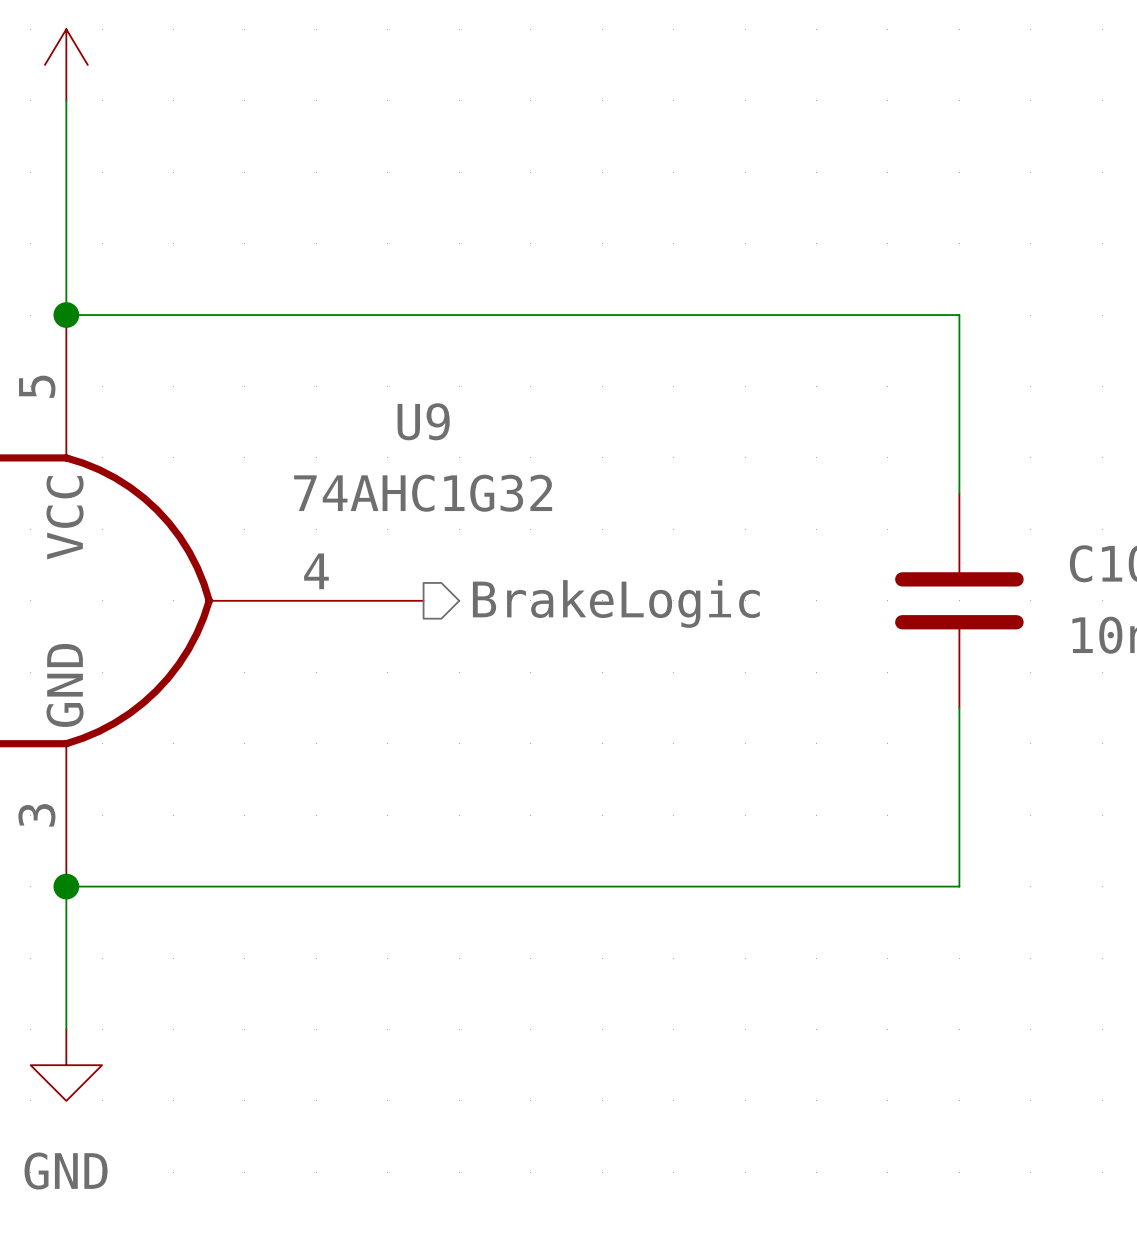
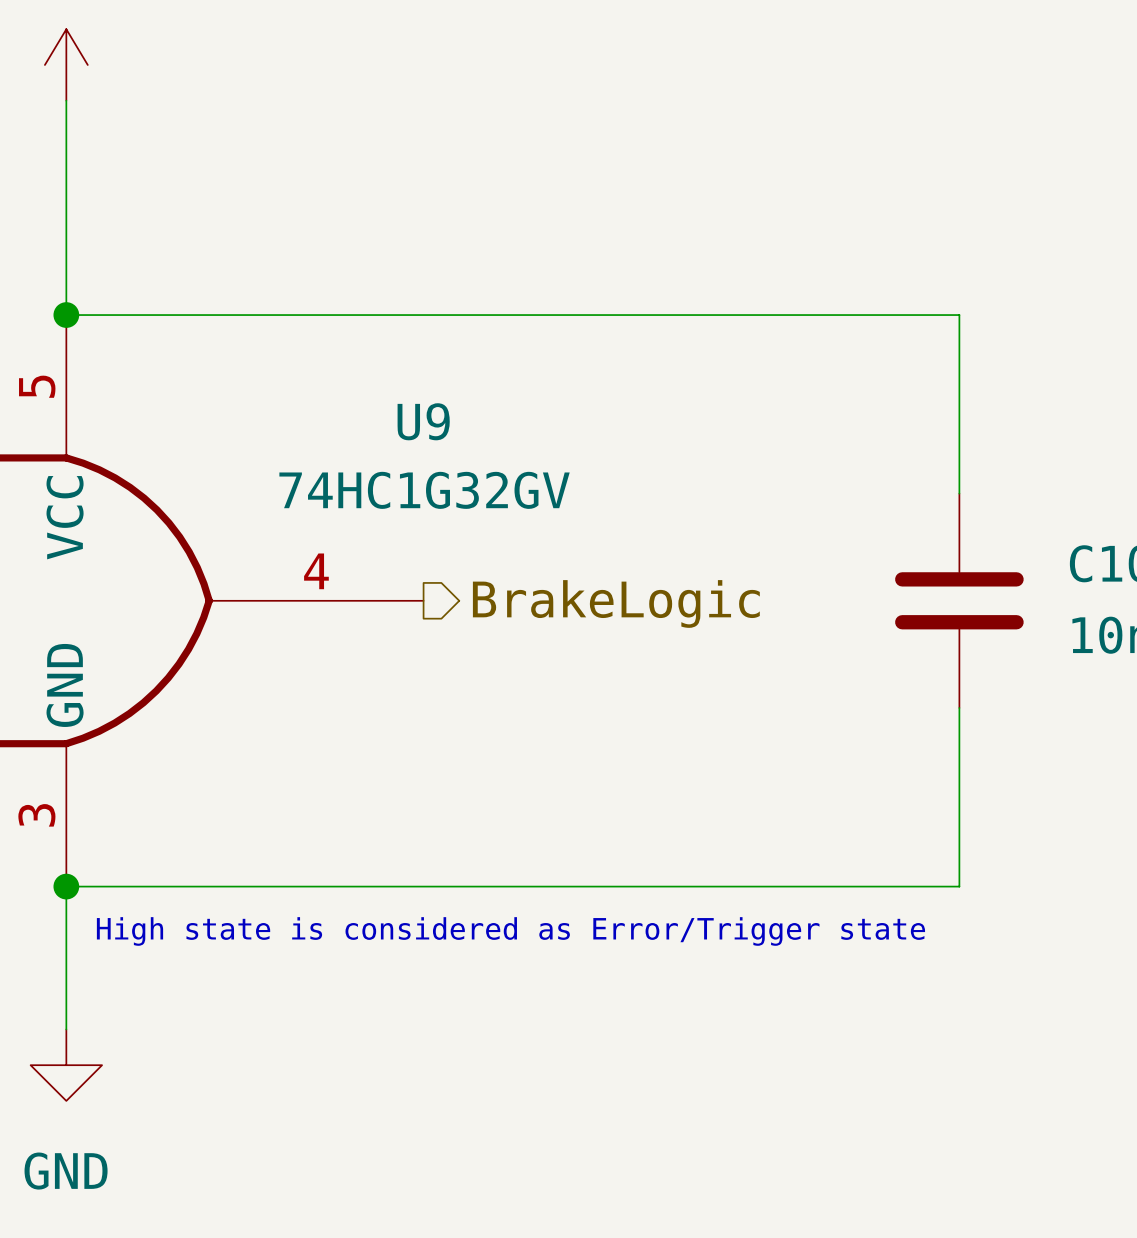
U9 value: 74AHC1G32 (423, 493) -> 74HC1G32GV (424, 490)
text: none -> High state is considered as Error/Trigger state (510, 931)

